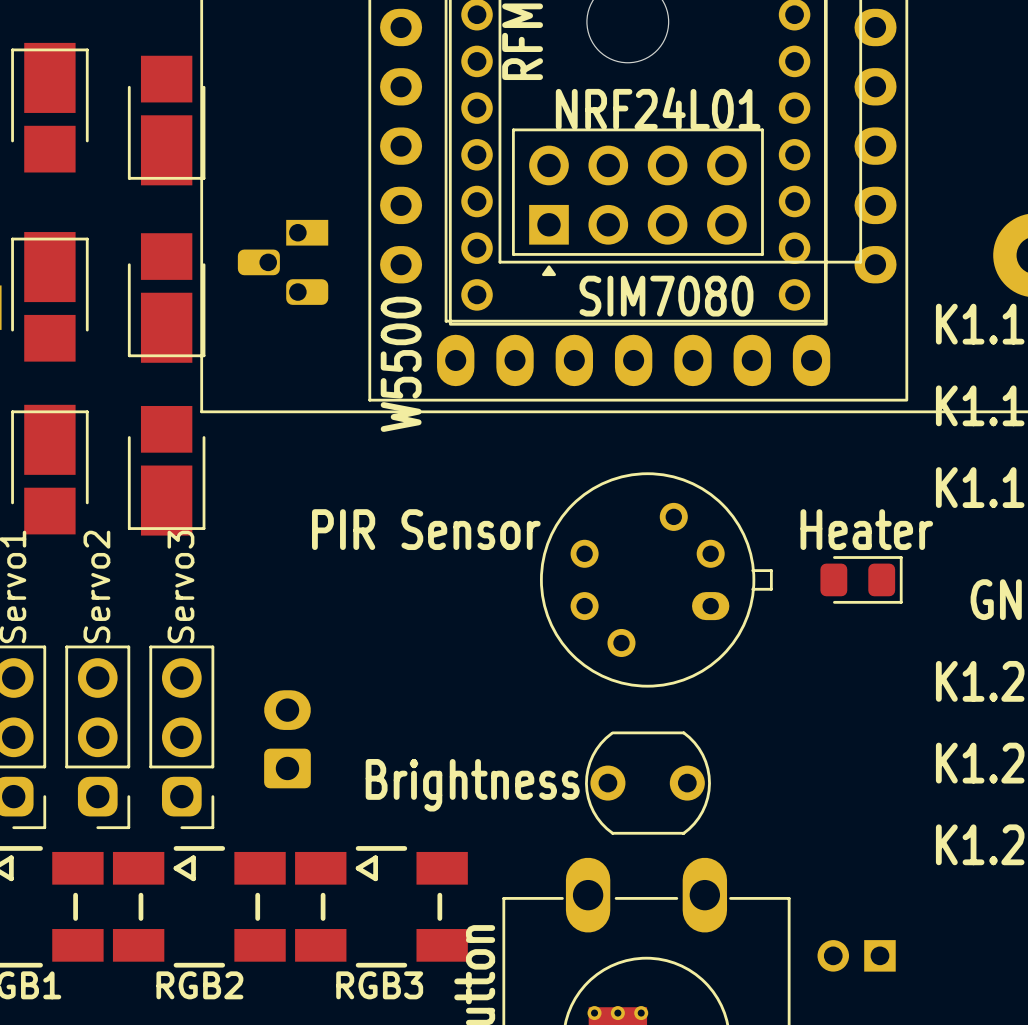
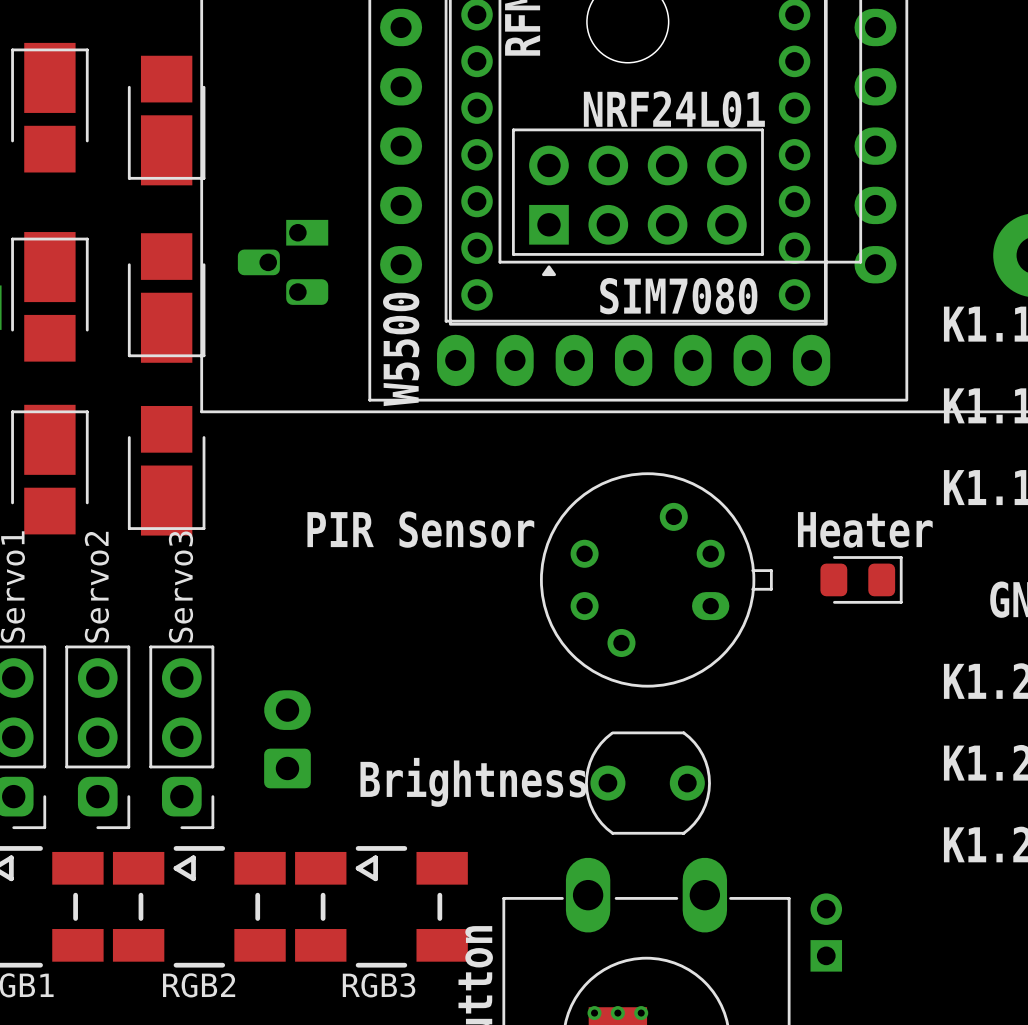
part rotation: 0° (856, 955) -> 90° clockwise (826, 932)

